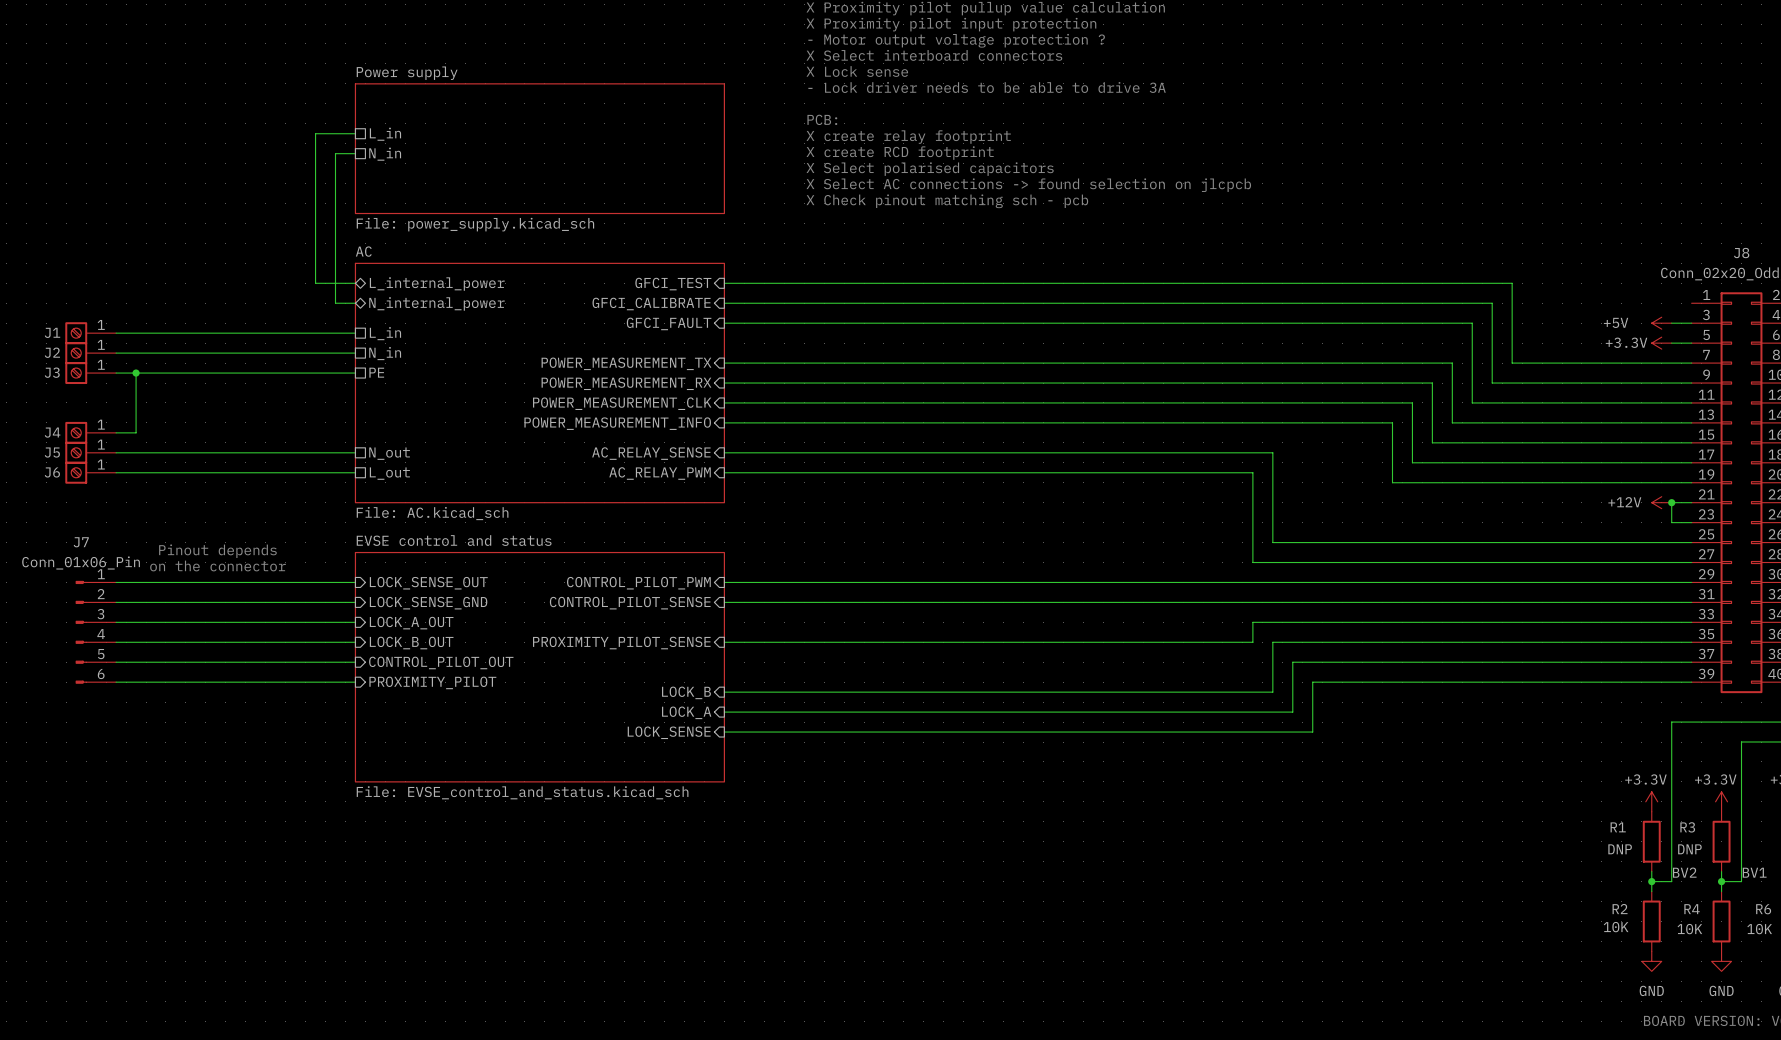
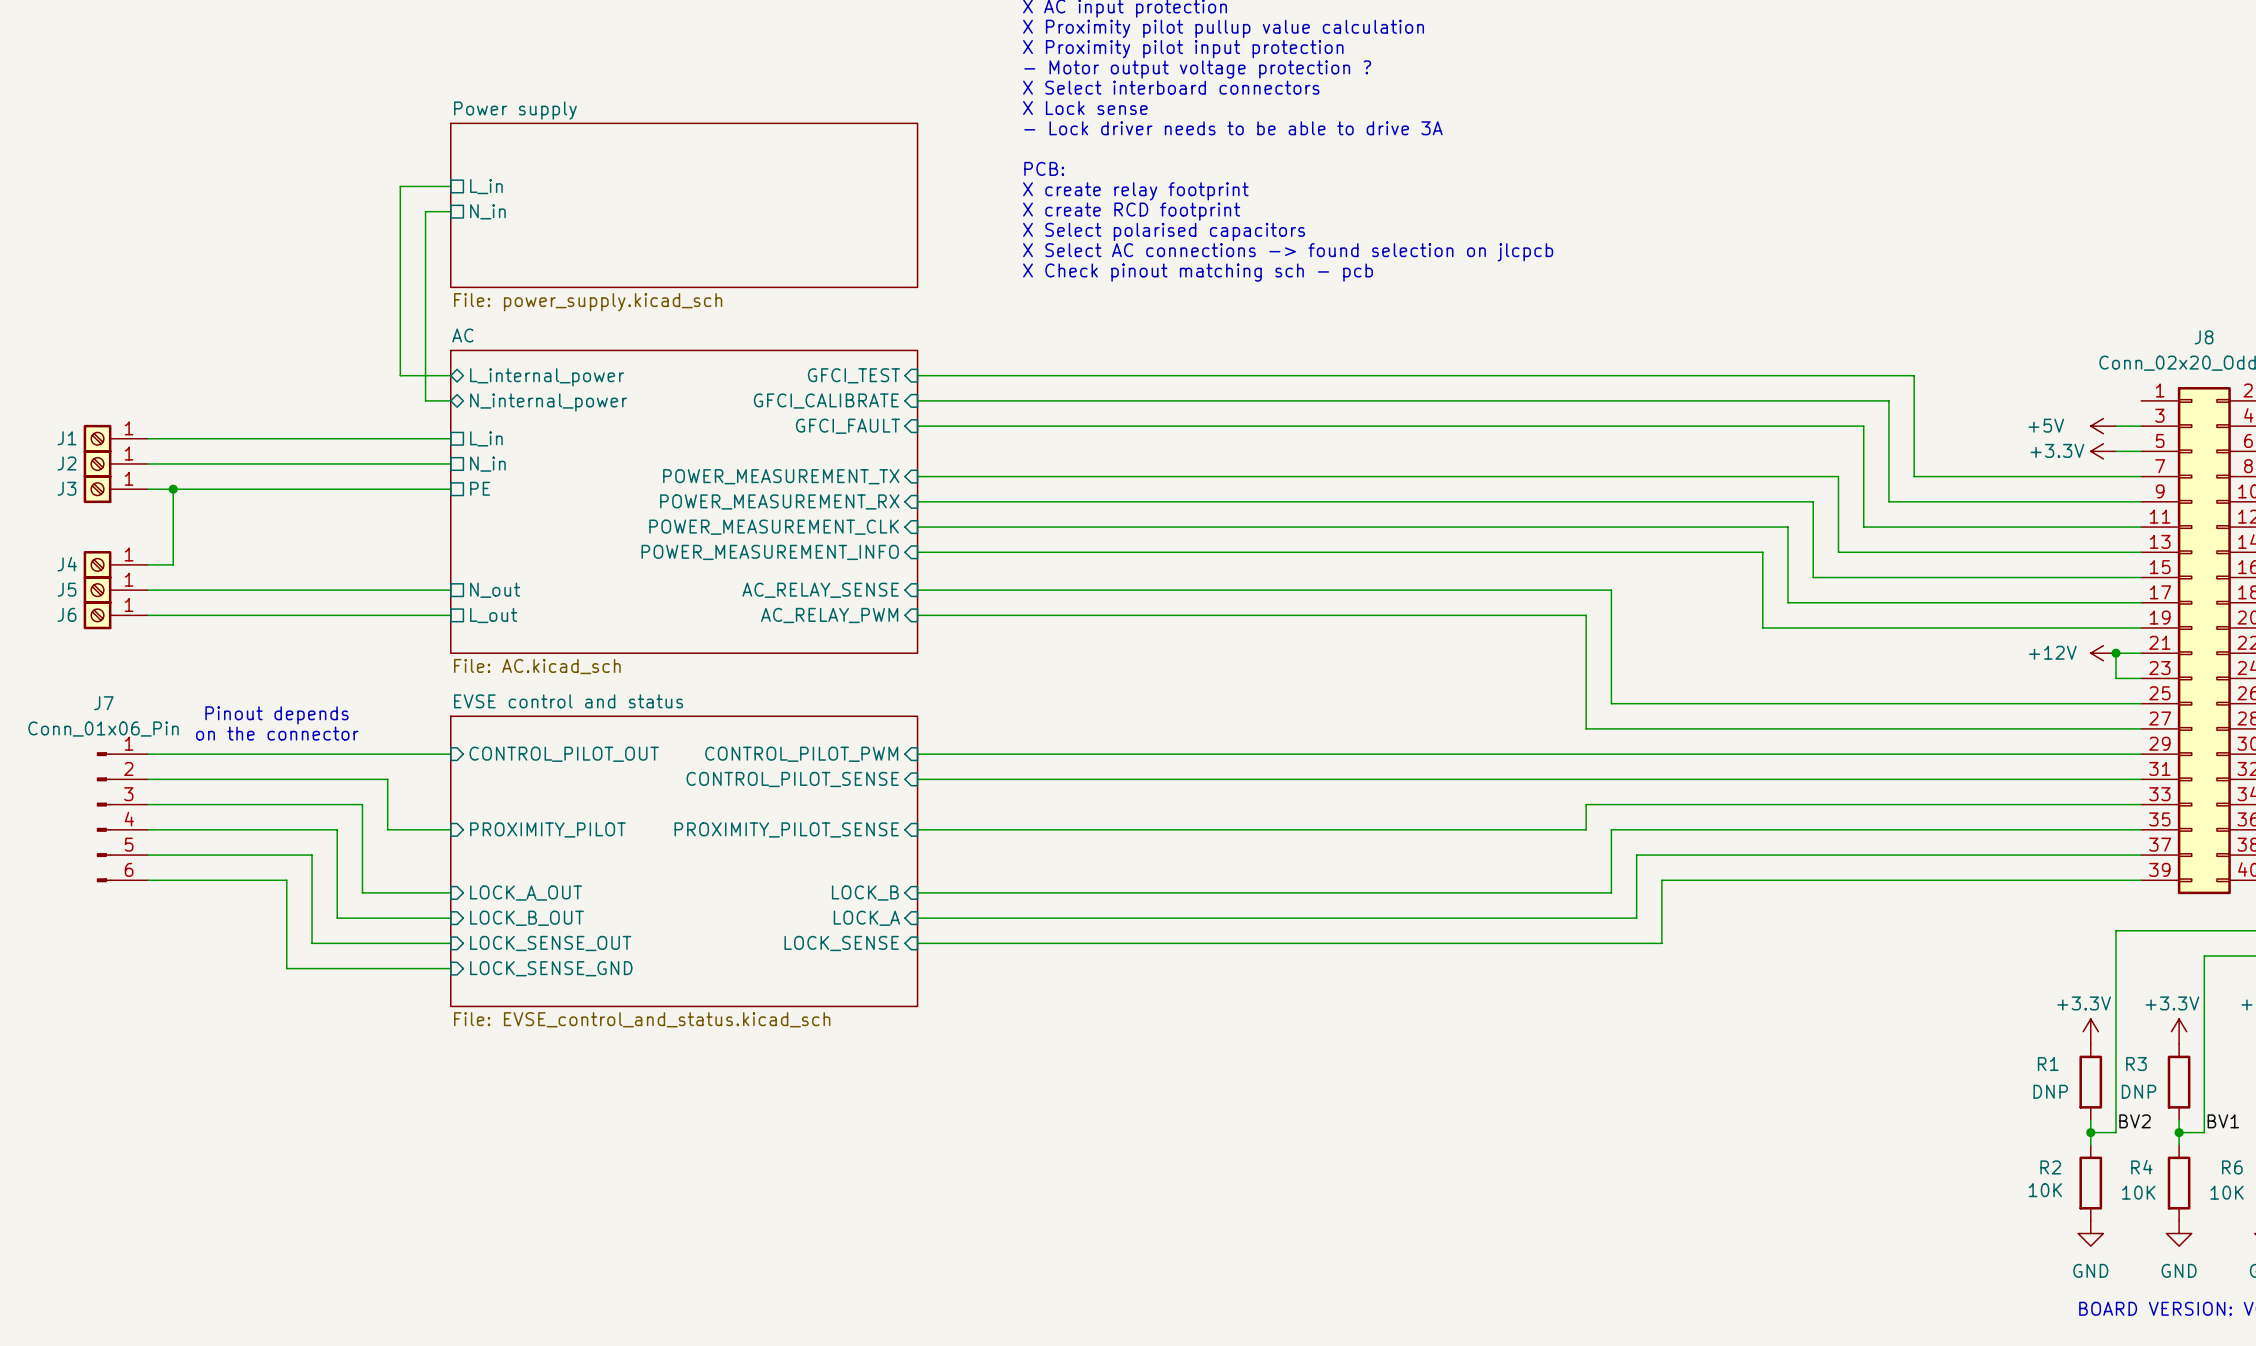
sheet pin: LOCK_SENSE_OUT (428, 583) -> CONTROL_PILOT_OUT (564, 754)
wire: (305, 602) (355, 602) -> none
sheet pin position: LOCK_SENSE_GND (428, 603) -> LOCK_SENSE_GND (551, 968)
wire: (285, 622) (355, 622) -> (362, 804) (362, 892) (450, 892)
sheet pin position: LOCK_A_OUT (411, 623) -> LOCK_A_OUT (526, 893)
wire: (265, 642) (305, 642) -> (387, 779) (387, 829)
wire: none -> (337, 829) (337, 918) (450, 918)
sheet pin: LOCK_B_OUT (411, 643) -> PROXIMITY_PILOT (547, 829)
wire: (245, 662) (355, 662) -> (312, 855) (312, 943) (450, 943)
sheet pin: CONTROL_PILOT_OUT (441, 662) -> none
wire: (225, 682) (355, 682) -> (286, 880) (286, 968) (450, 968)
sheet pin: PROXIMITY_PILOT (432, 682) -> none
sheet pin: none -> LOCK_B_OUT (526, 918)
sheet pin: none -> LOCK_SENSE_OUT (550, 943)

